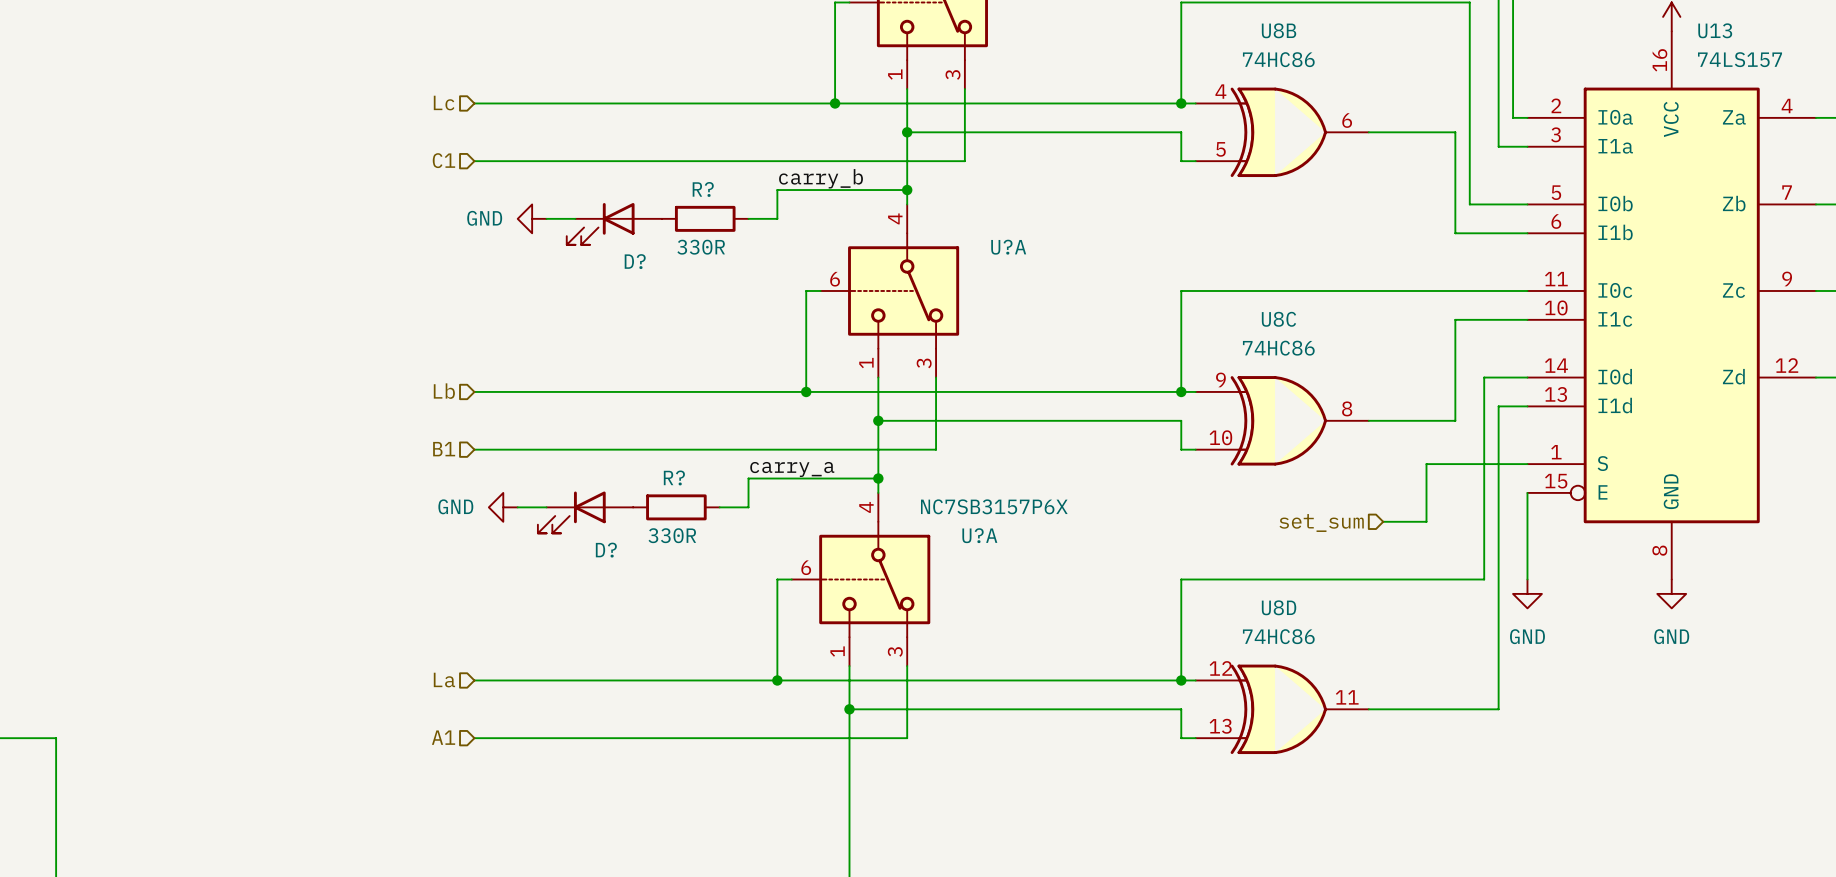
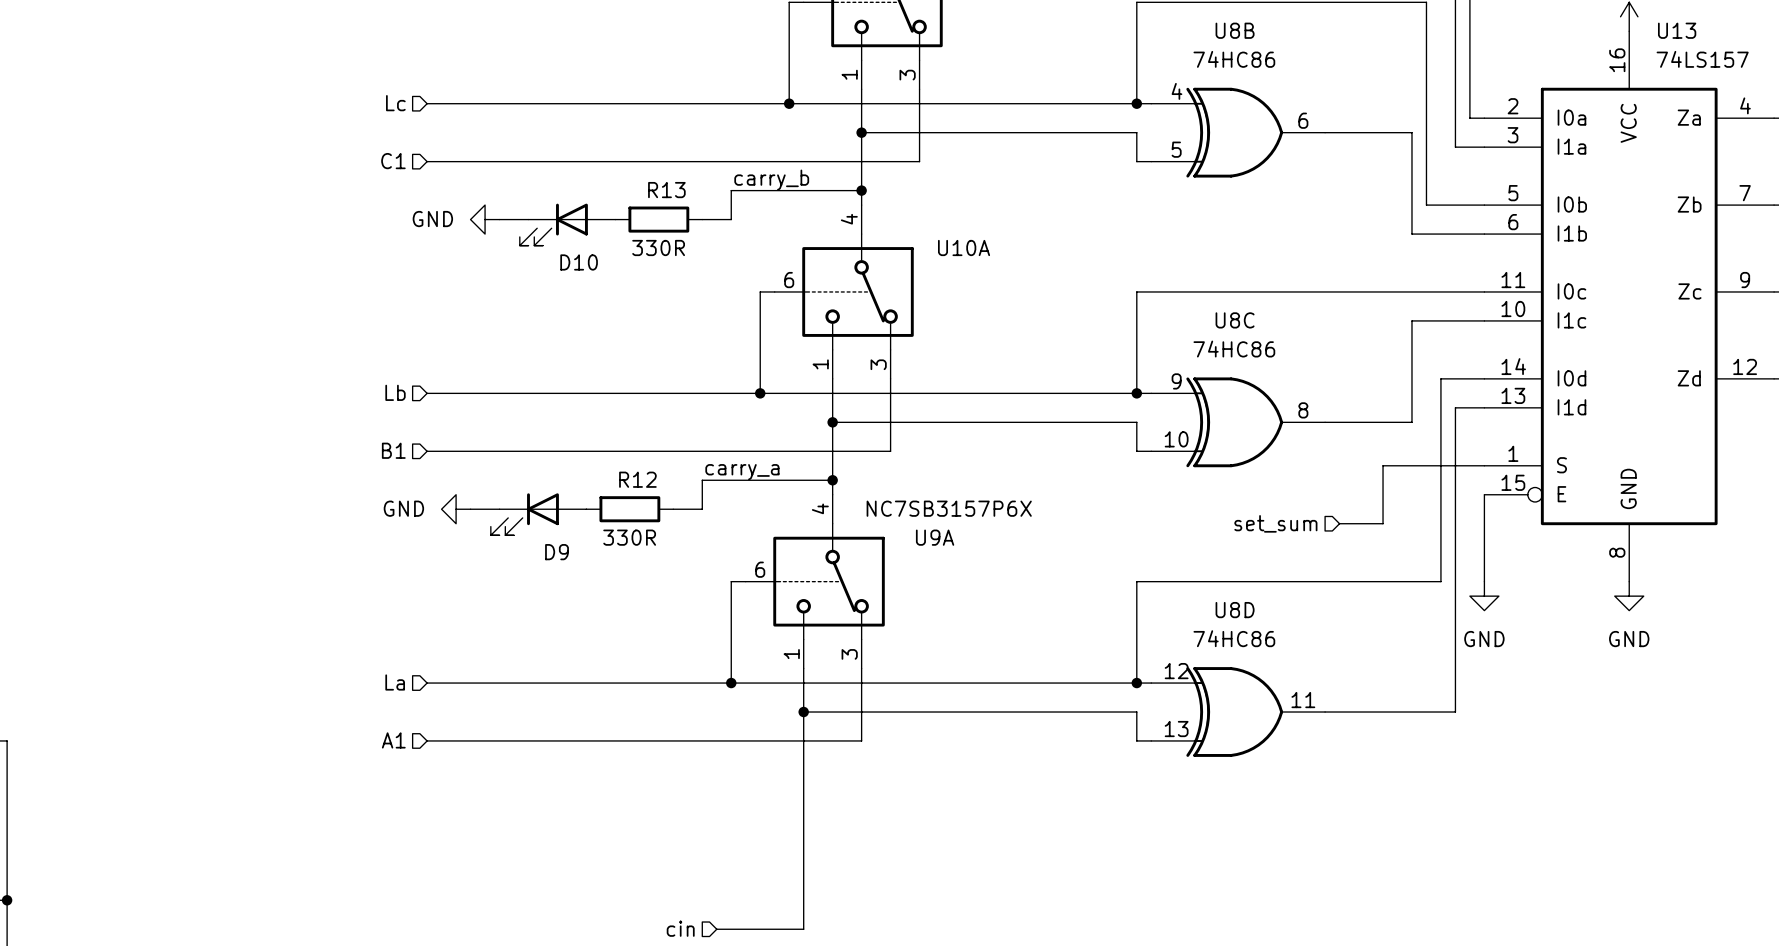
R? name: R? (703, 189) -> R13 (666, 190)
U?A name: U?A (1008, 247) -> U10A (964, 247)
D? name: D? (635, 261) -> D10 (579, 262)
R? name: R? (674, 477) -> R12 (637, 479)
U?A name: U?A (979, 535) -> U9A (935, 537)
D? name: D? (606, 550) -> D9 (557, 552)

